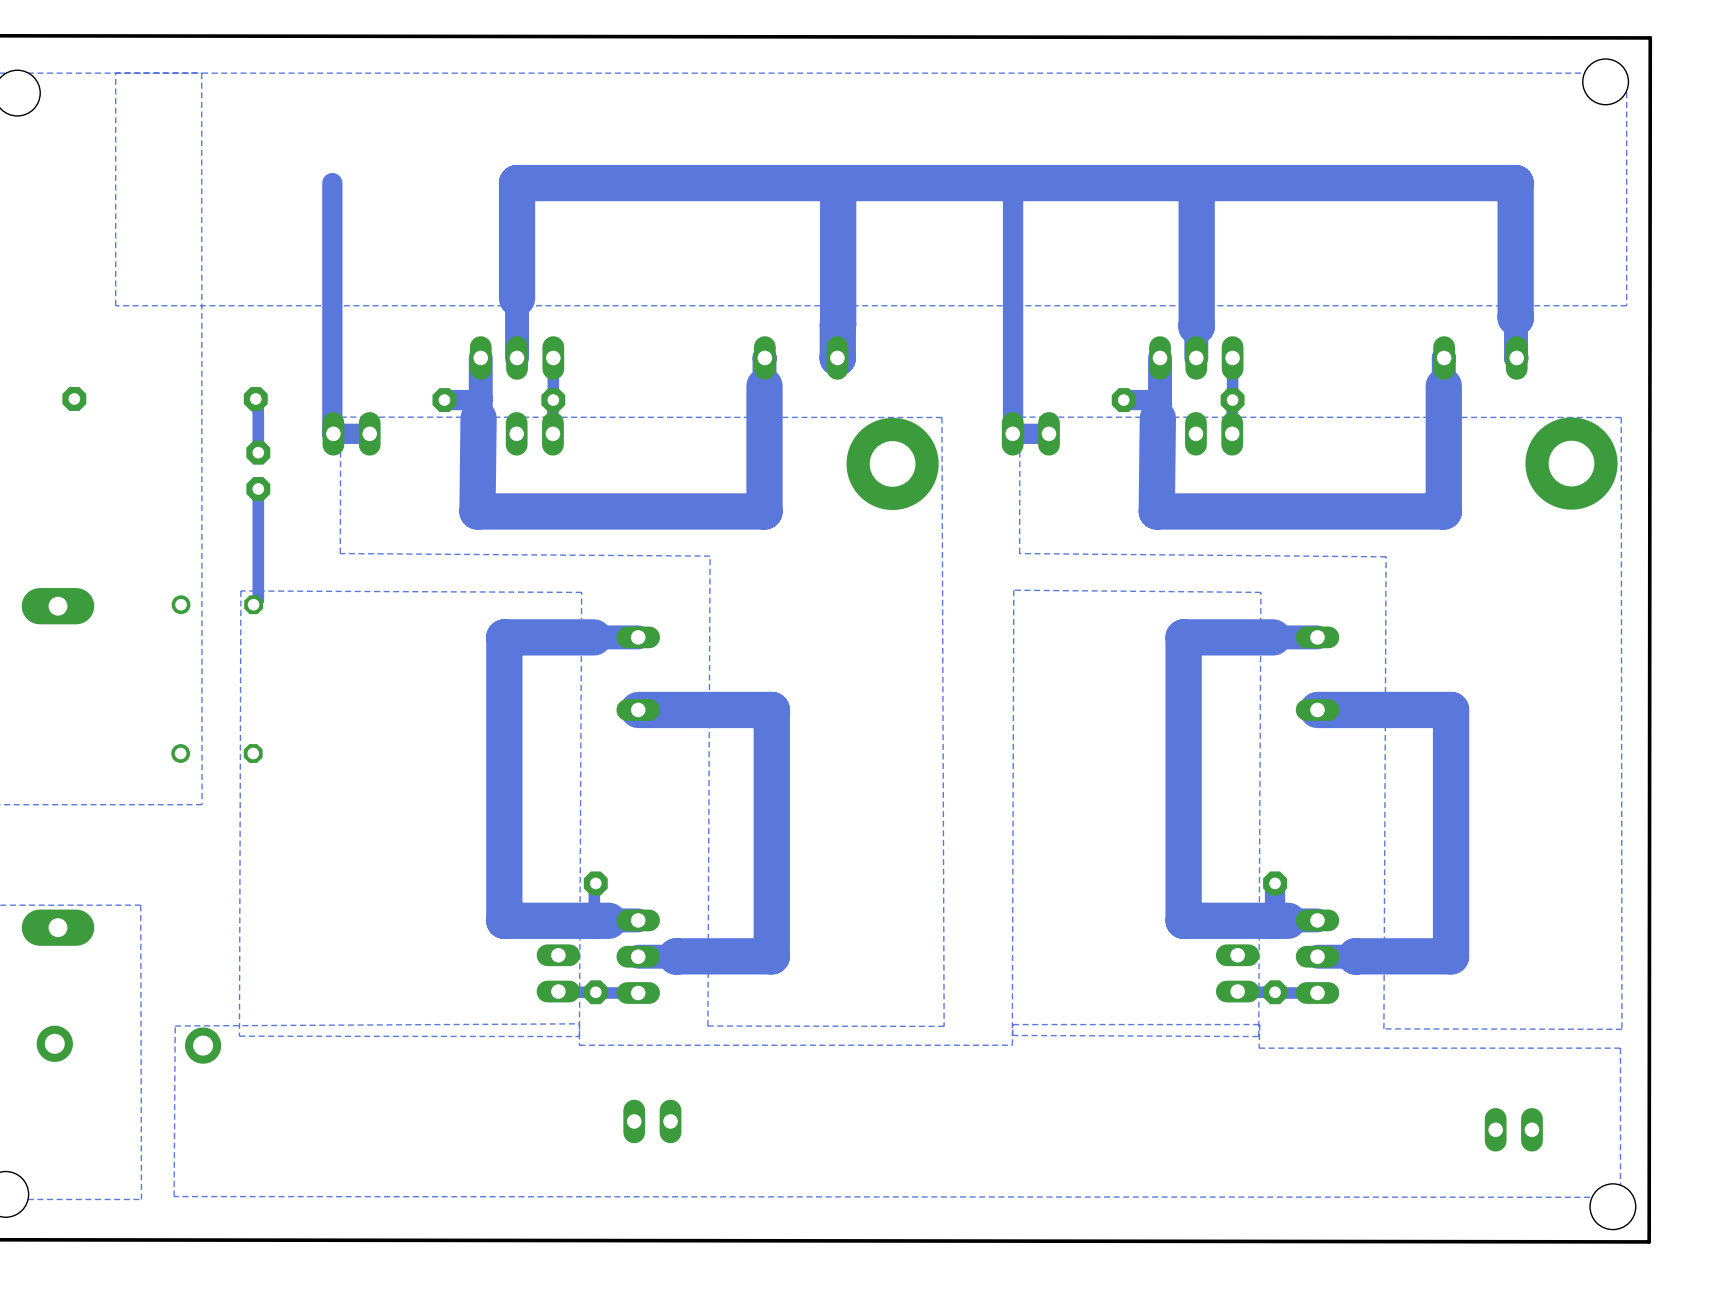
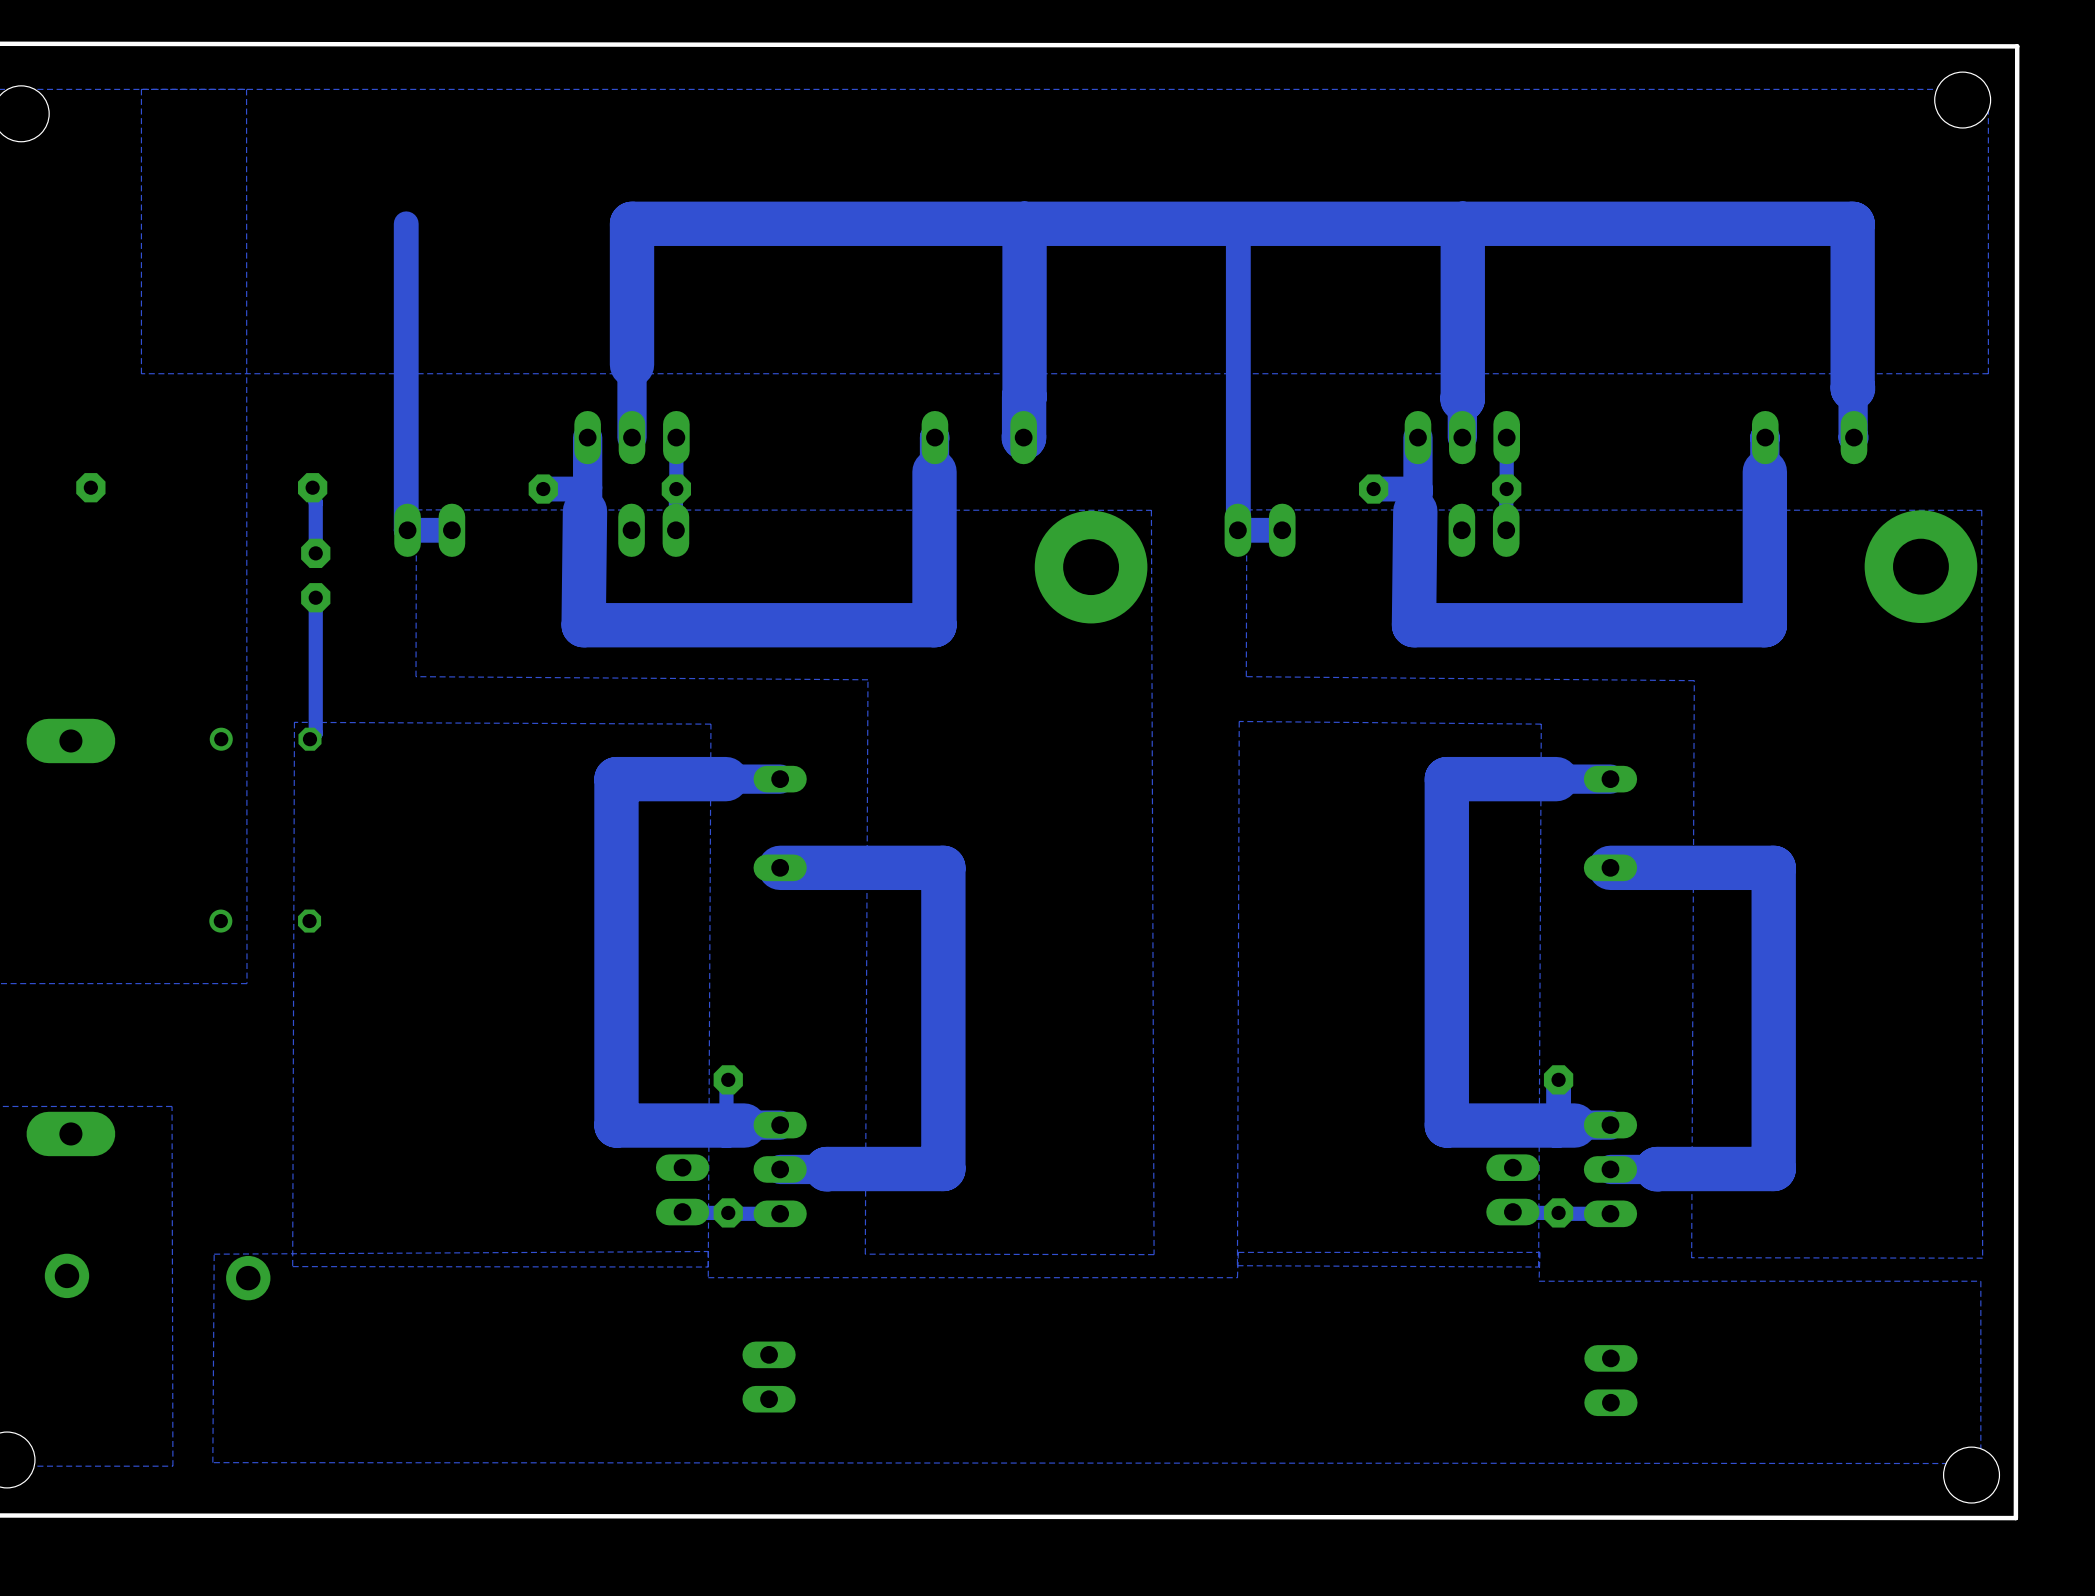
part rotation: 0° (652, 1121) -> 90° clockwise (769, 1377)
part rotation: 0° (1513, 1129) -> 90° clockwise (1610, 1380)
part position: (1513, 1129) -> (1610, 1380)

